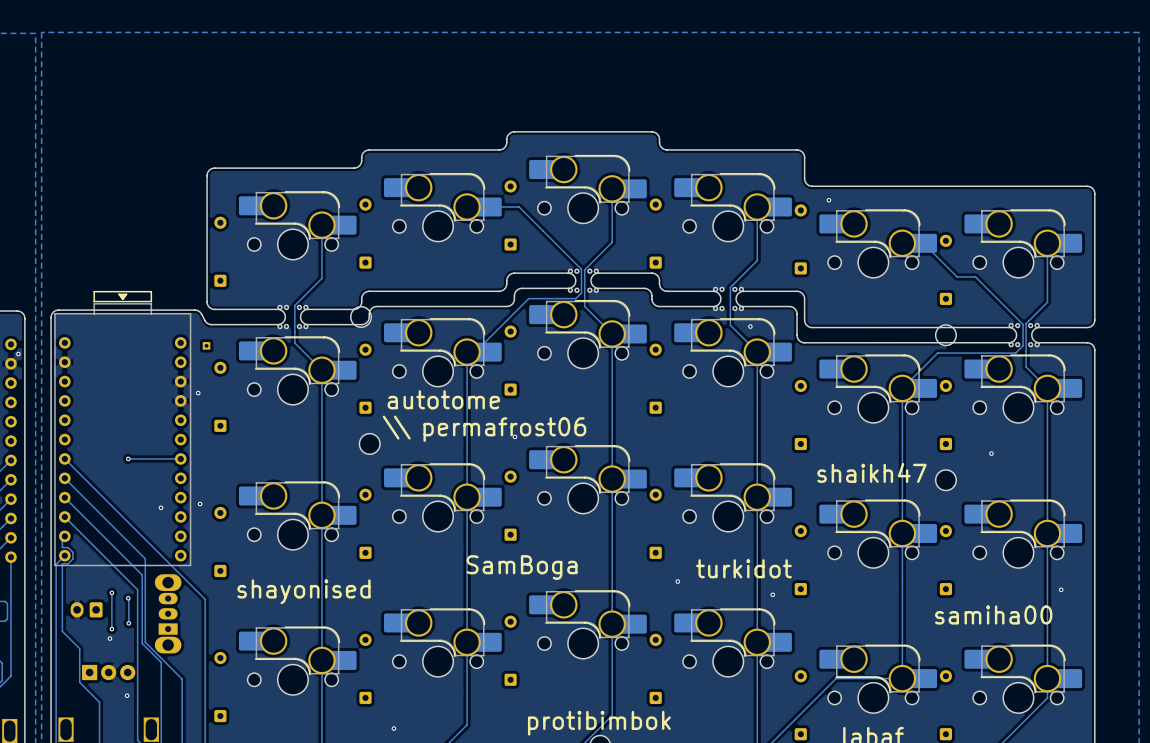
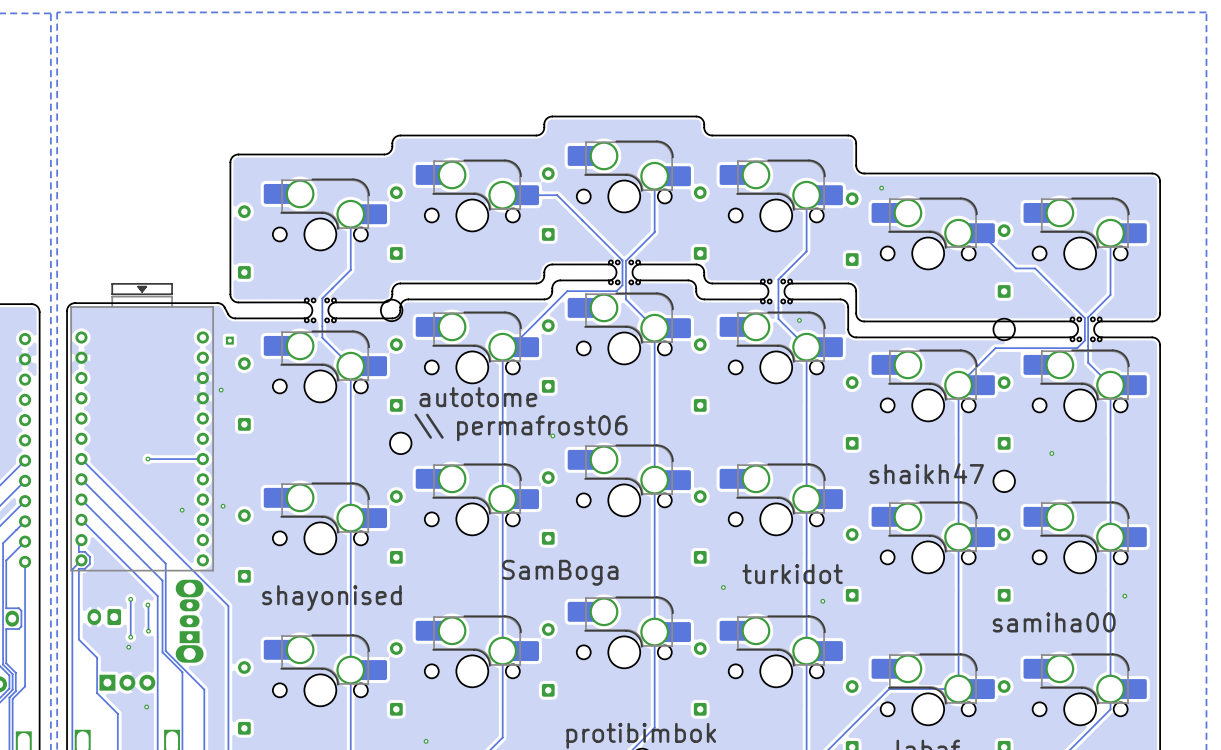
via: (18, 354) -> none

